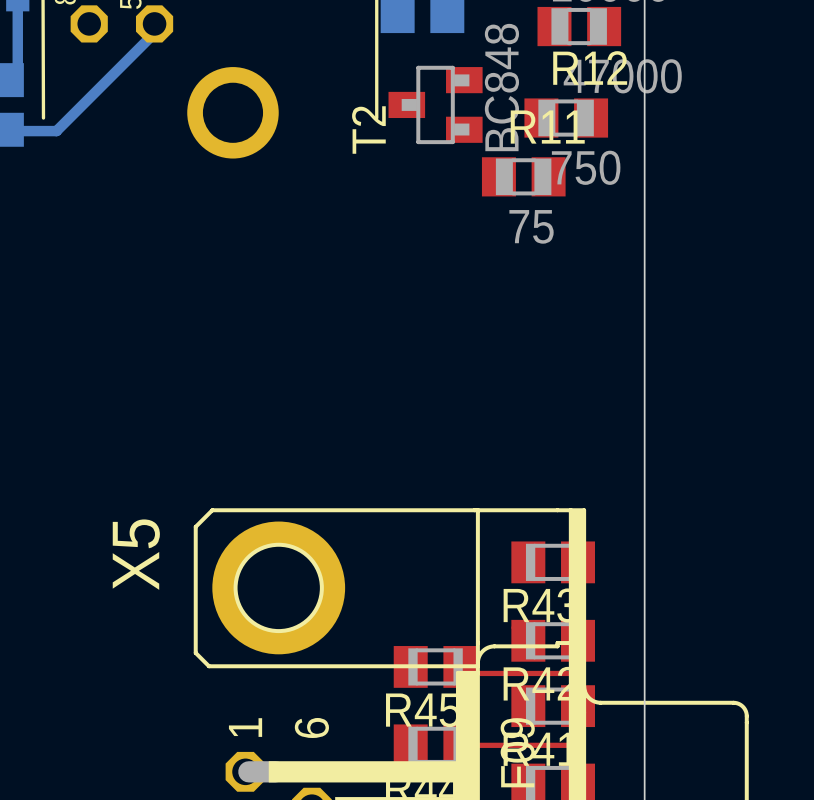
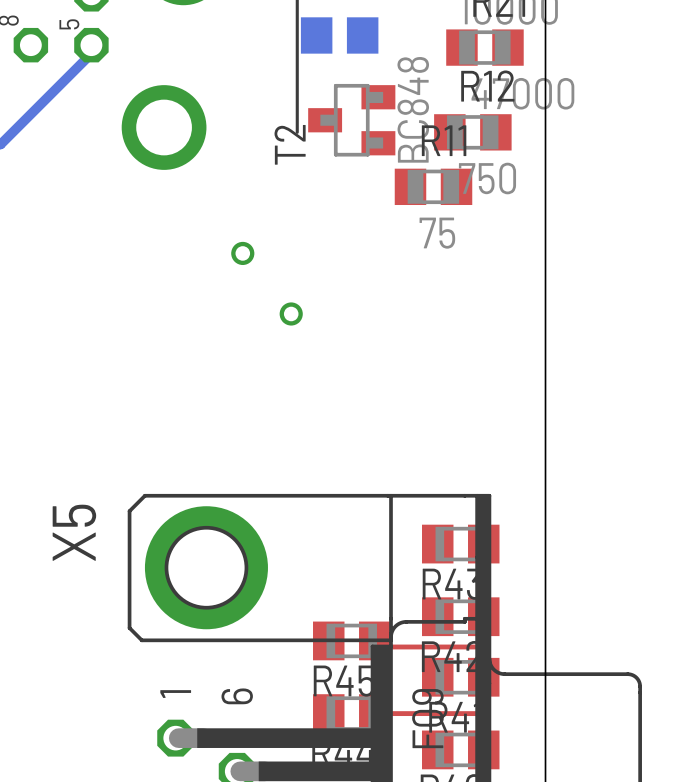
via: none -> (242, 253)
via: none -> (291, 313)

